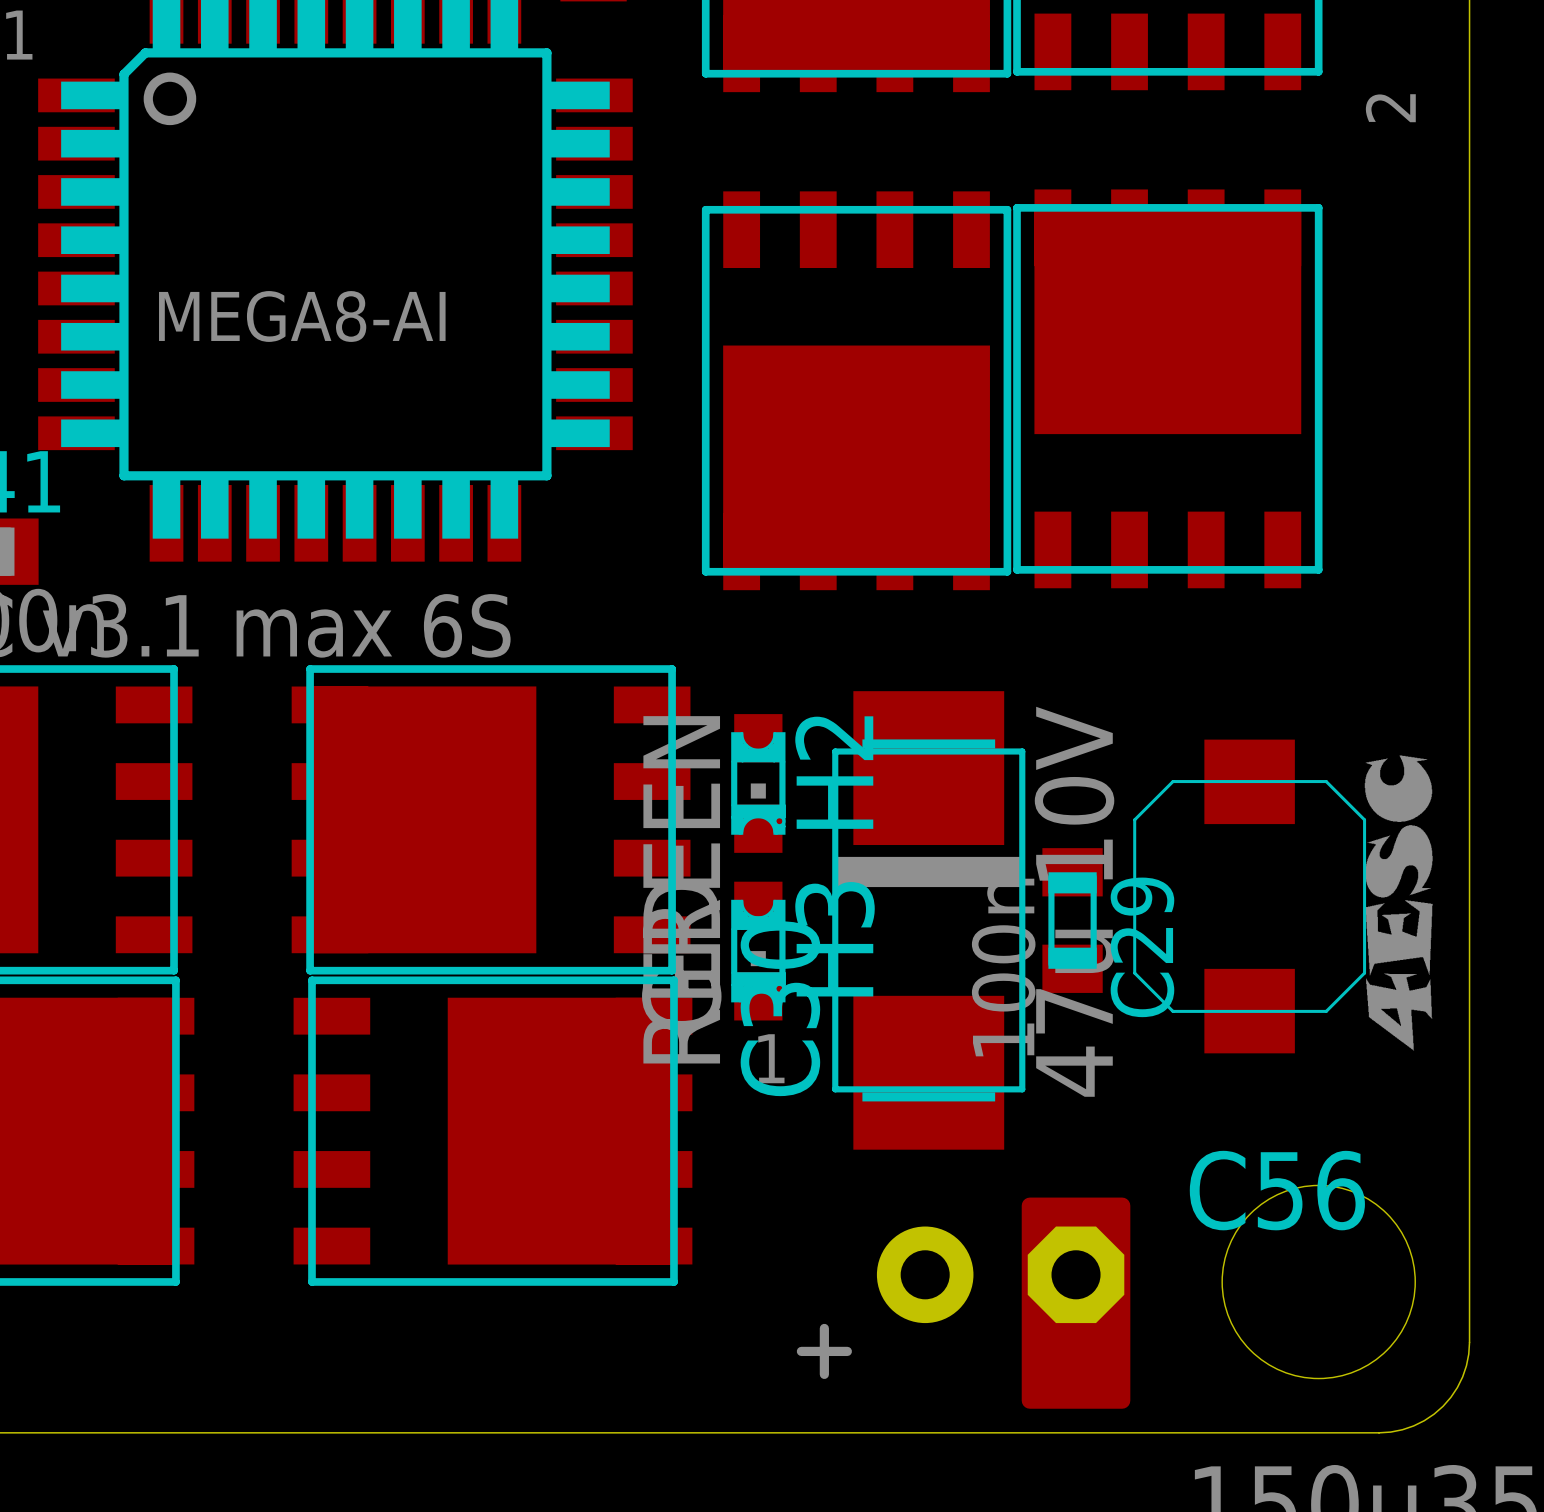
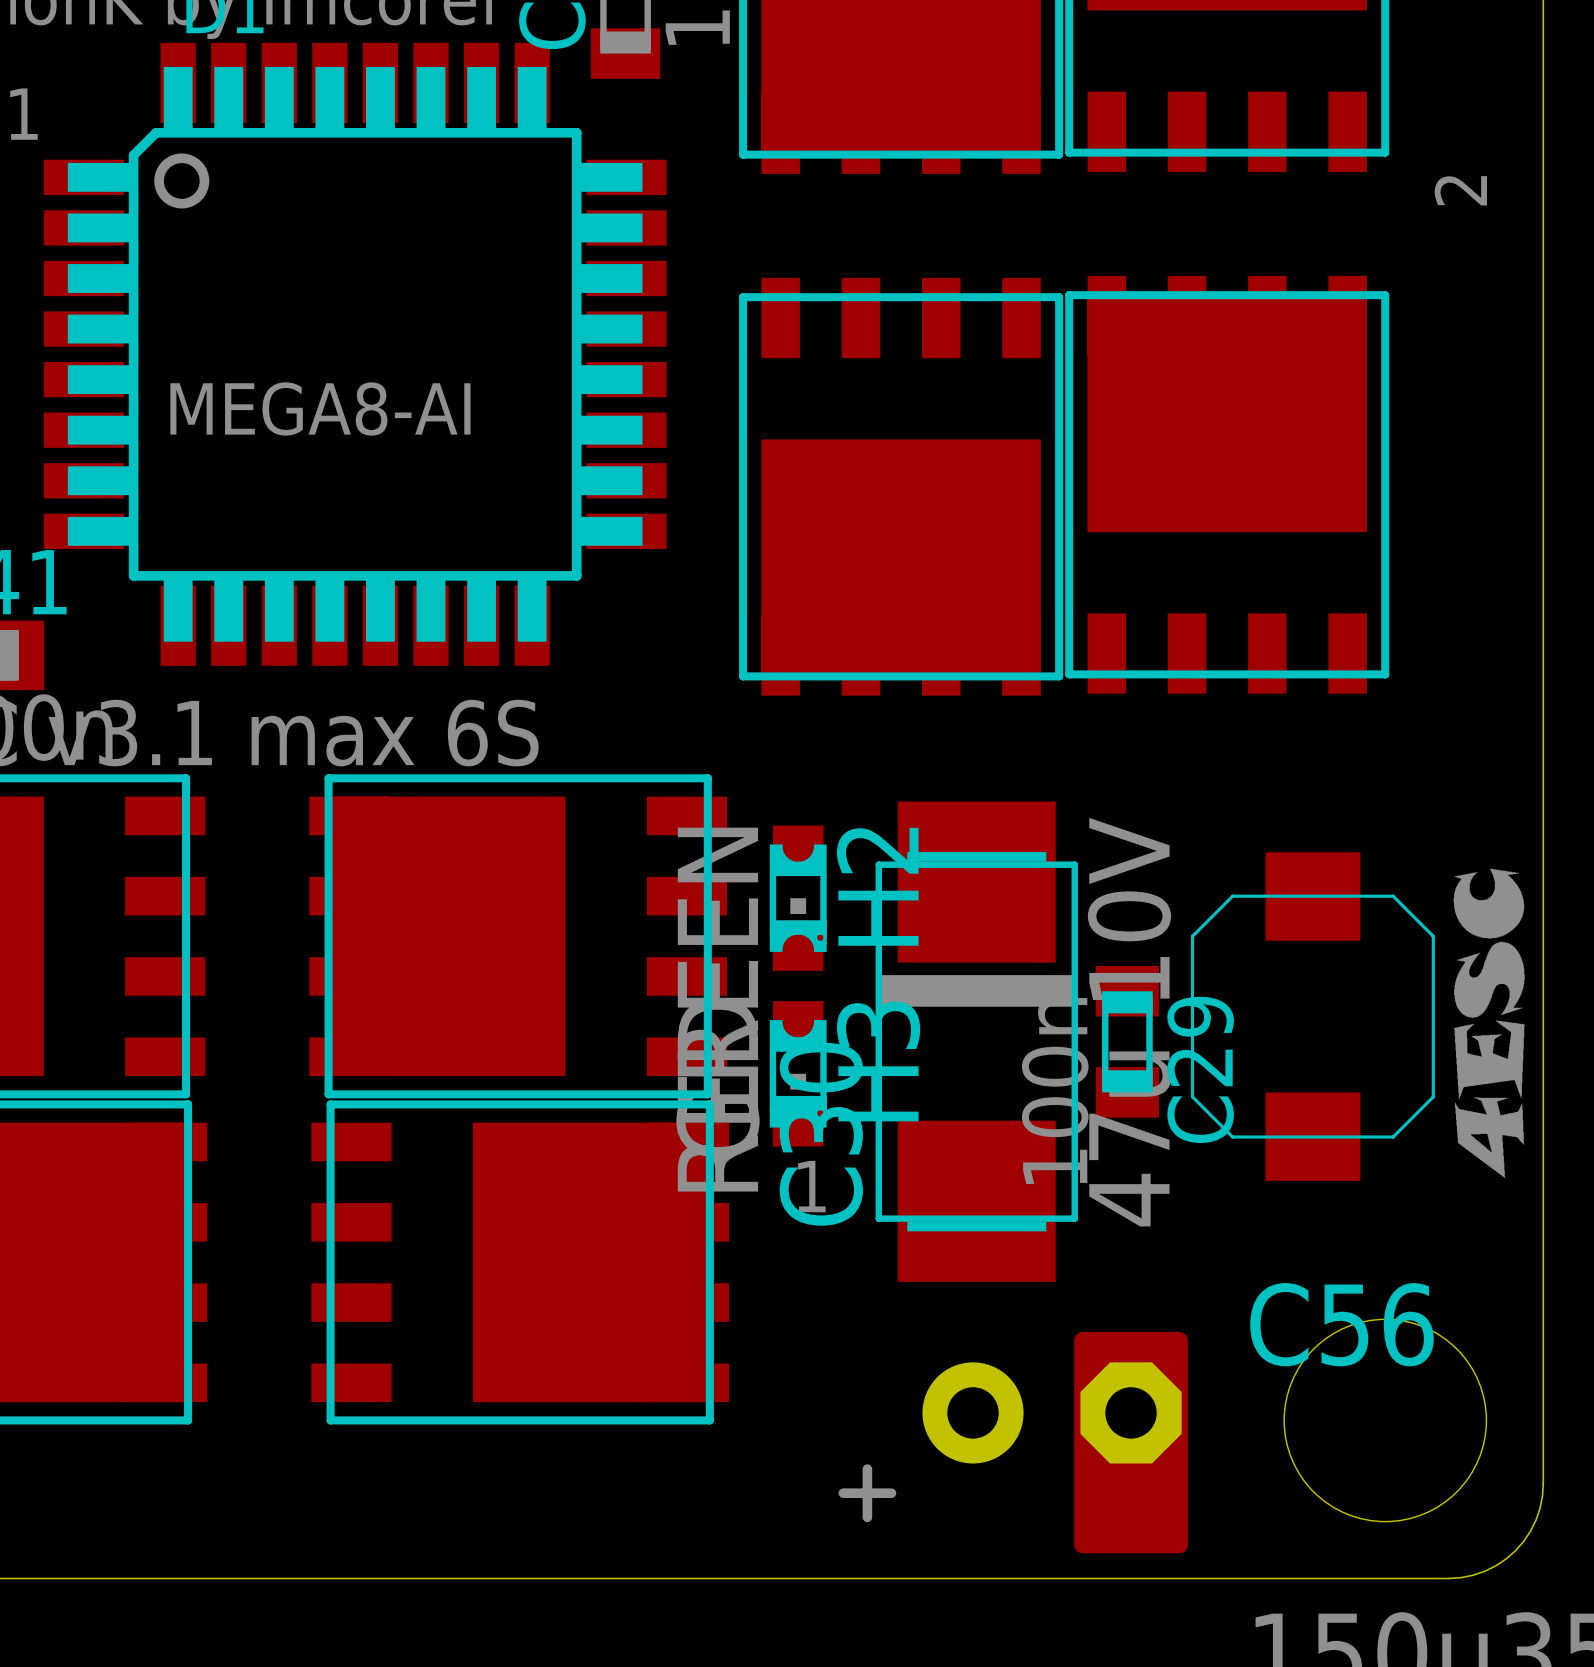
drawing position: (1398, 902) -> (1489, 1023)

